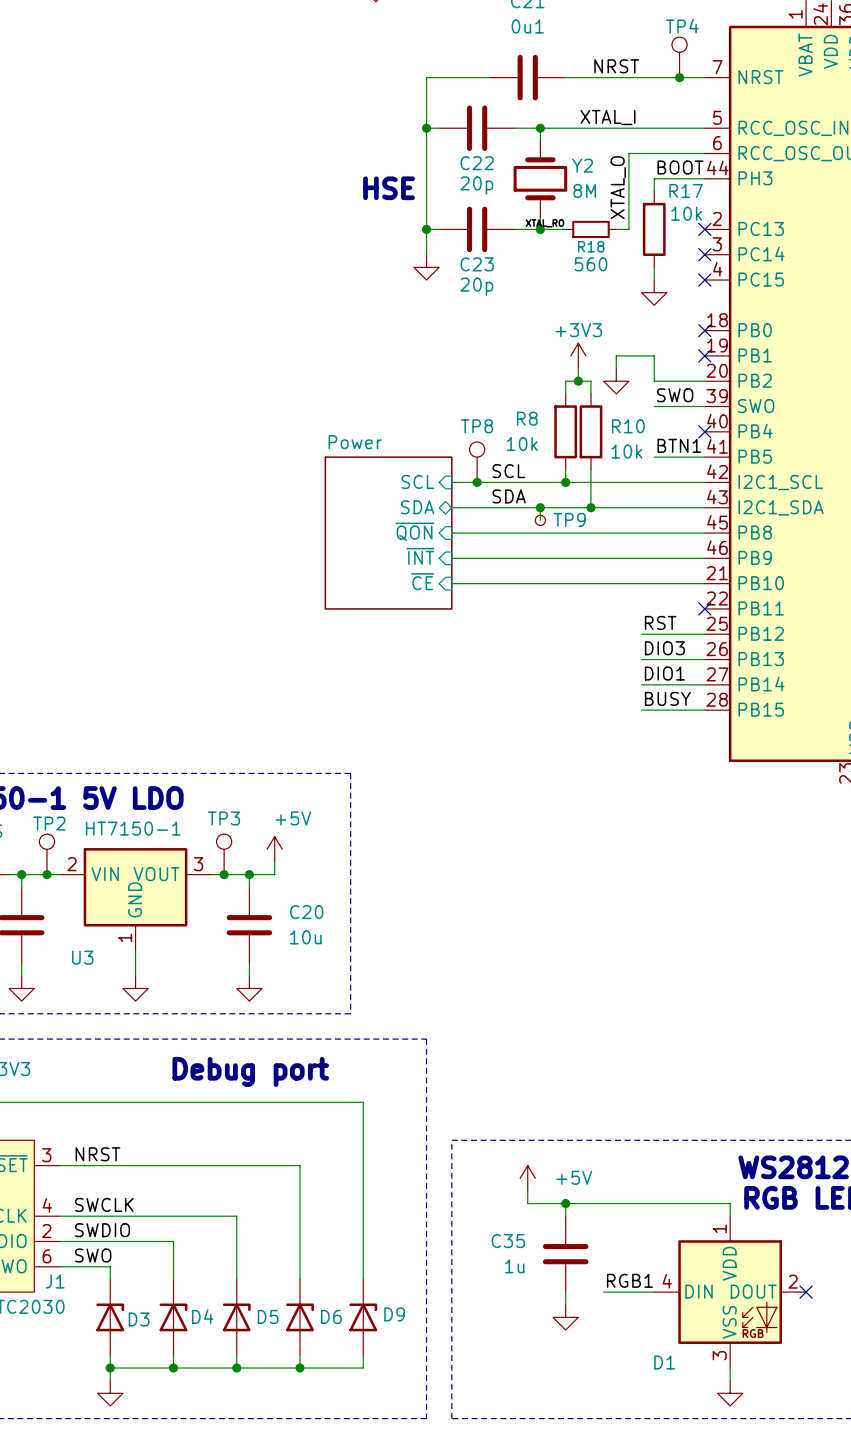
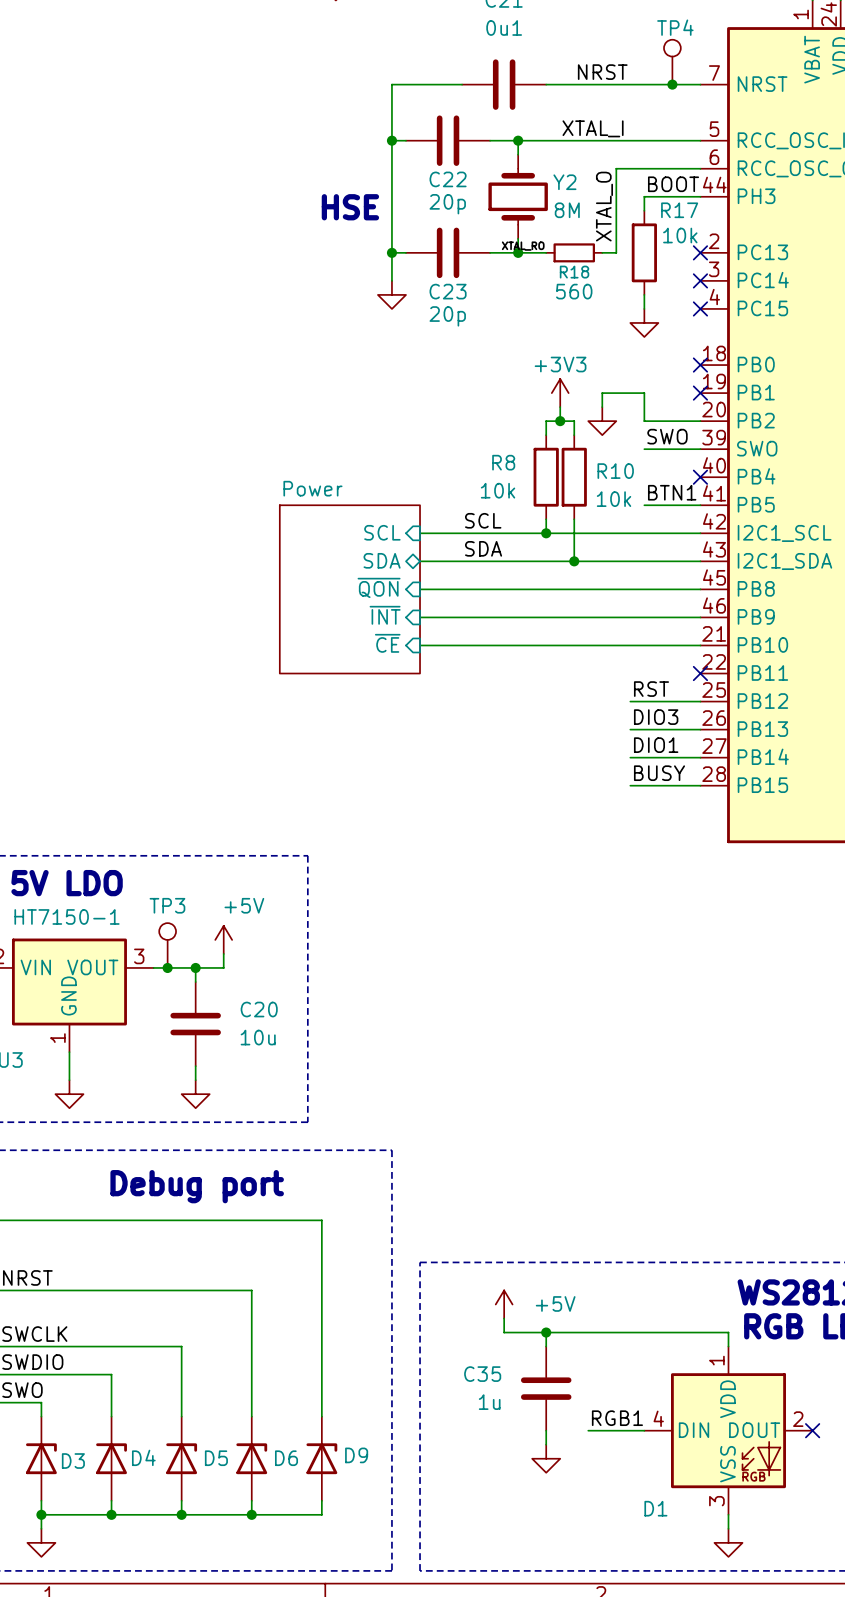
TP8: (477, 462) -> none
junction: (477, 482) -> none
wire: (540, 507) (540, 520) -> none
junction: (540, 507) -> none
TP9: (540, 520) -> none

